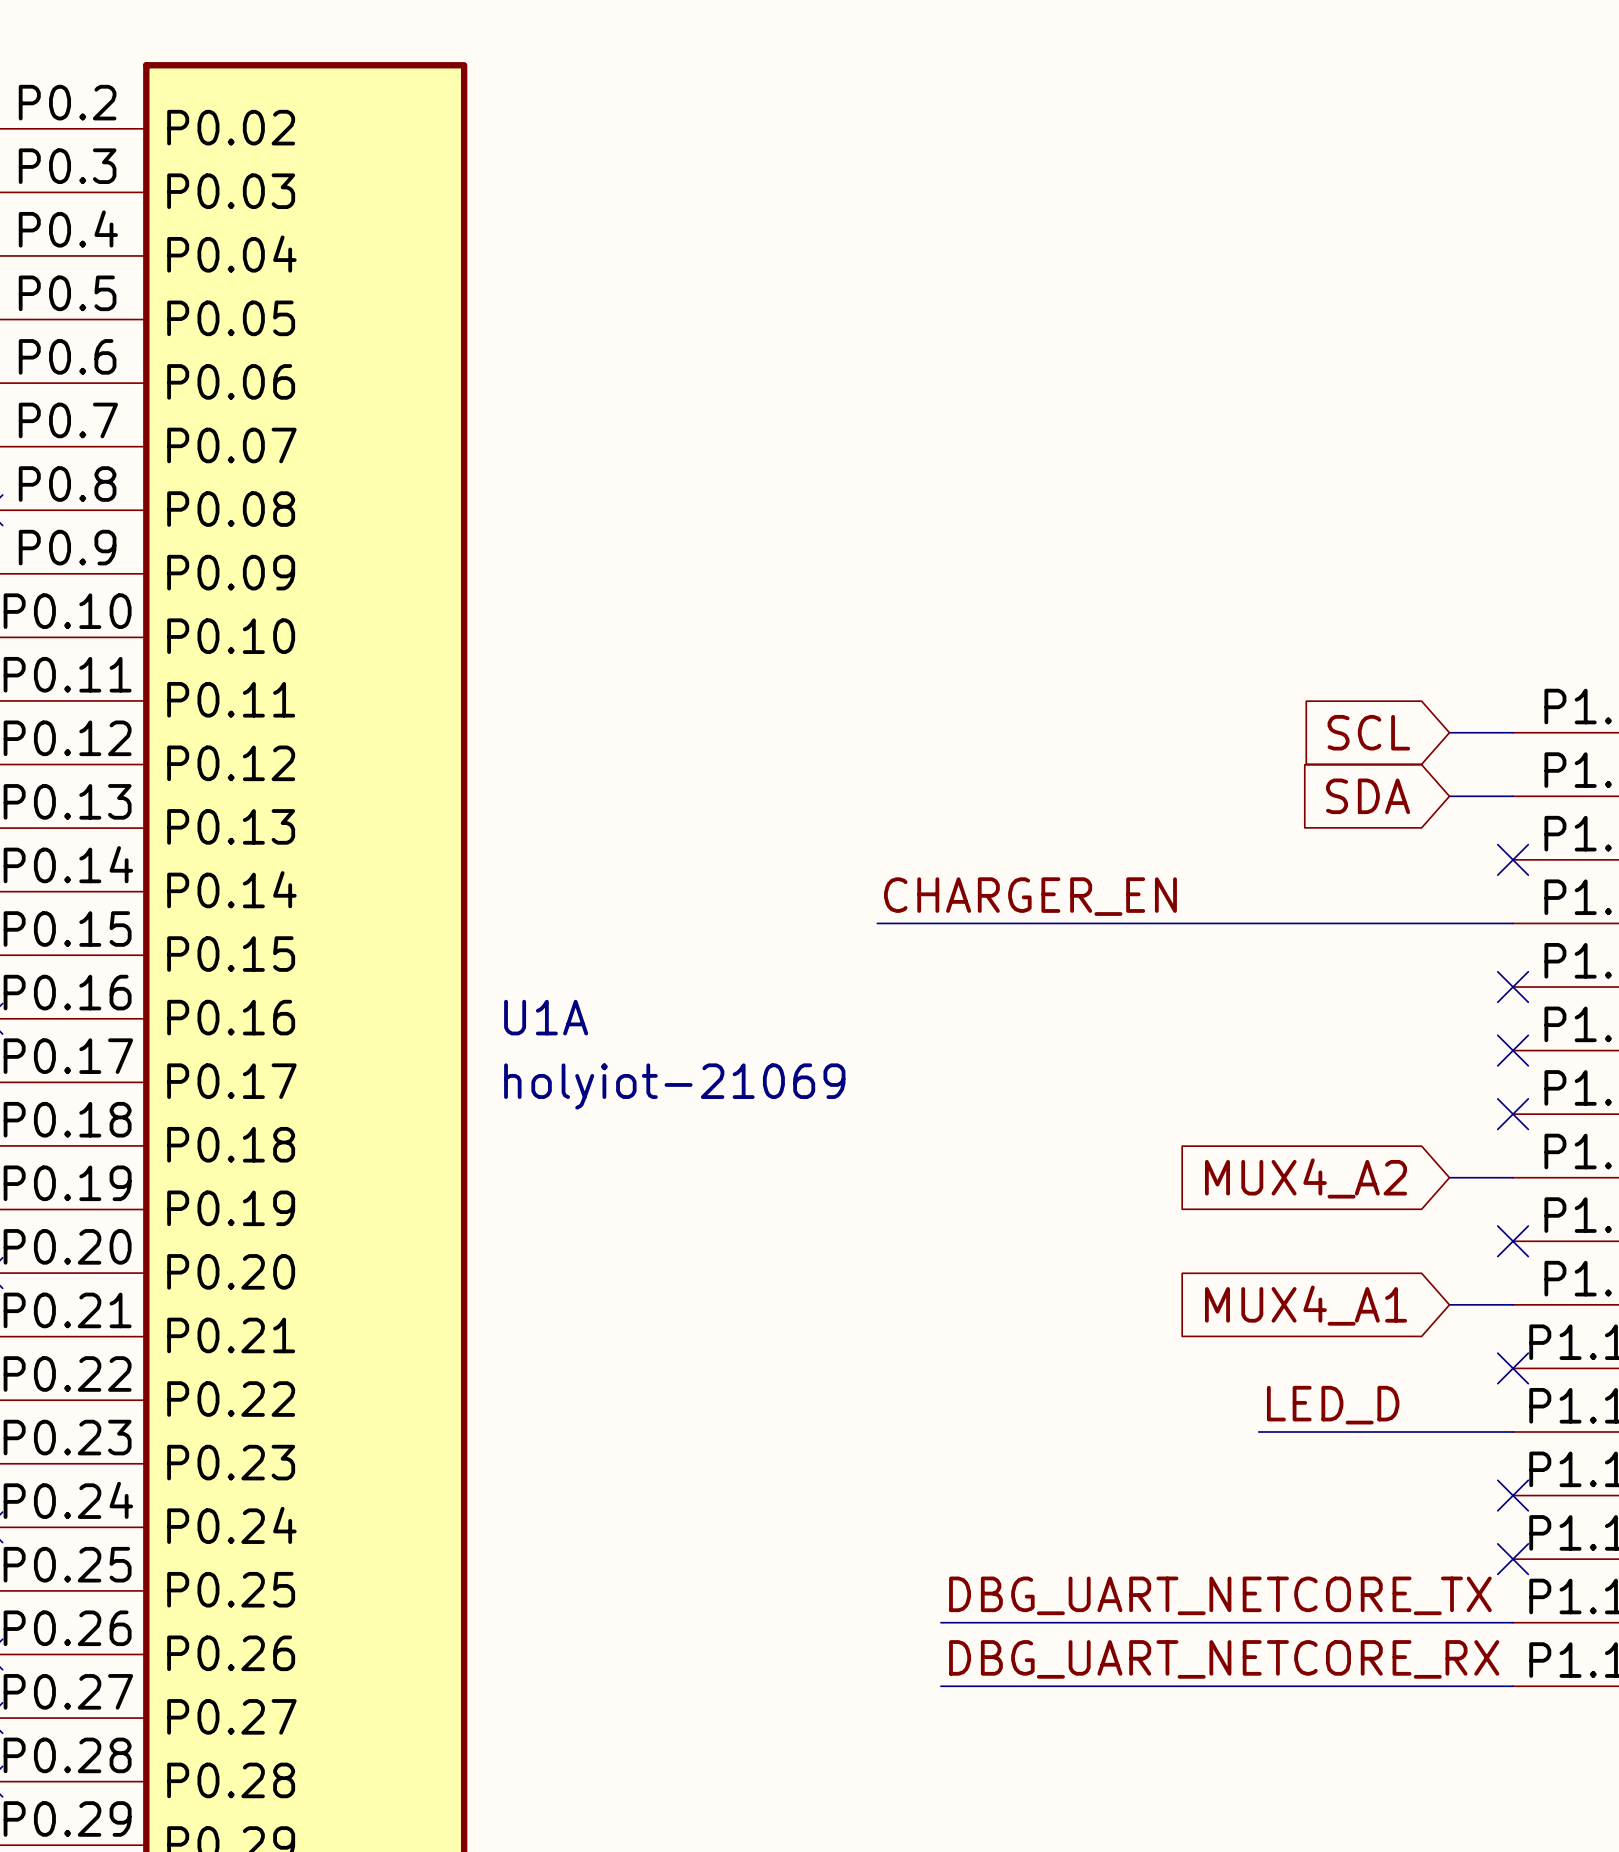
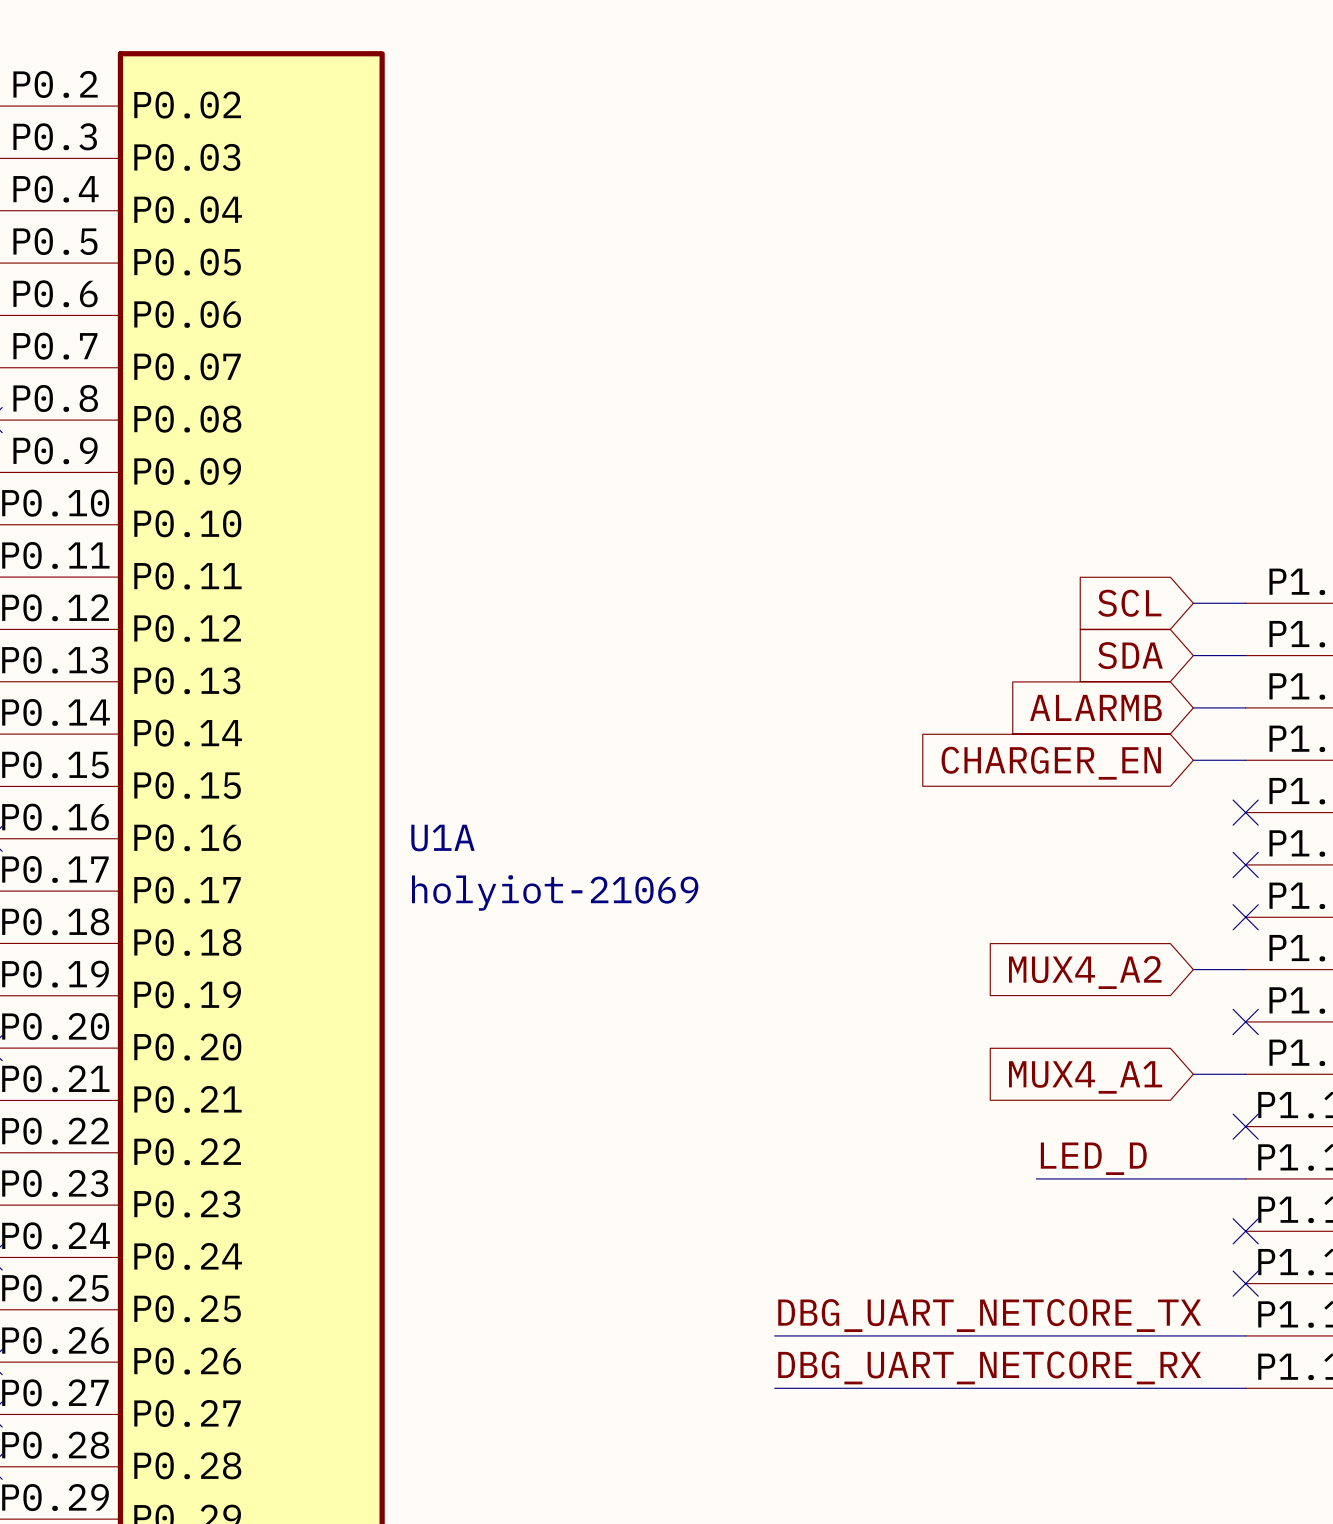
global label: none -> ALARMB (1095, 707)
wire: none -> (1193, 707) (1245, 707)
no-connect mark: (1513, 859) -> none
label: CHARGER_EN (1030, 896) -> none
wire: (877, 923) (1449, 923) -> none
global label: none -> CHARGER_EN (1051, 763)

